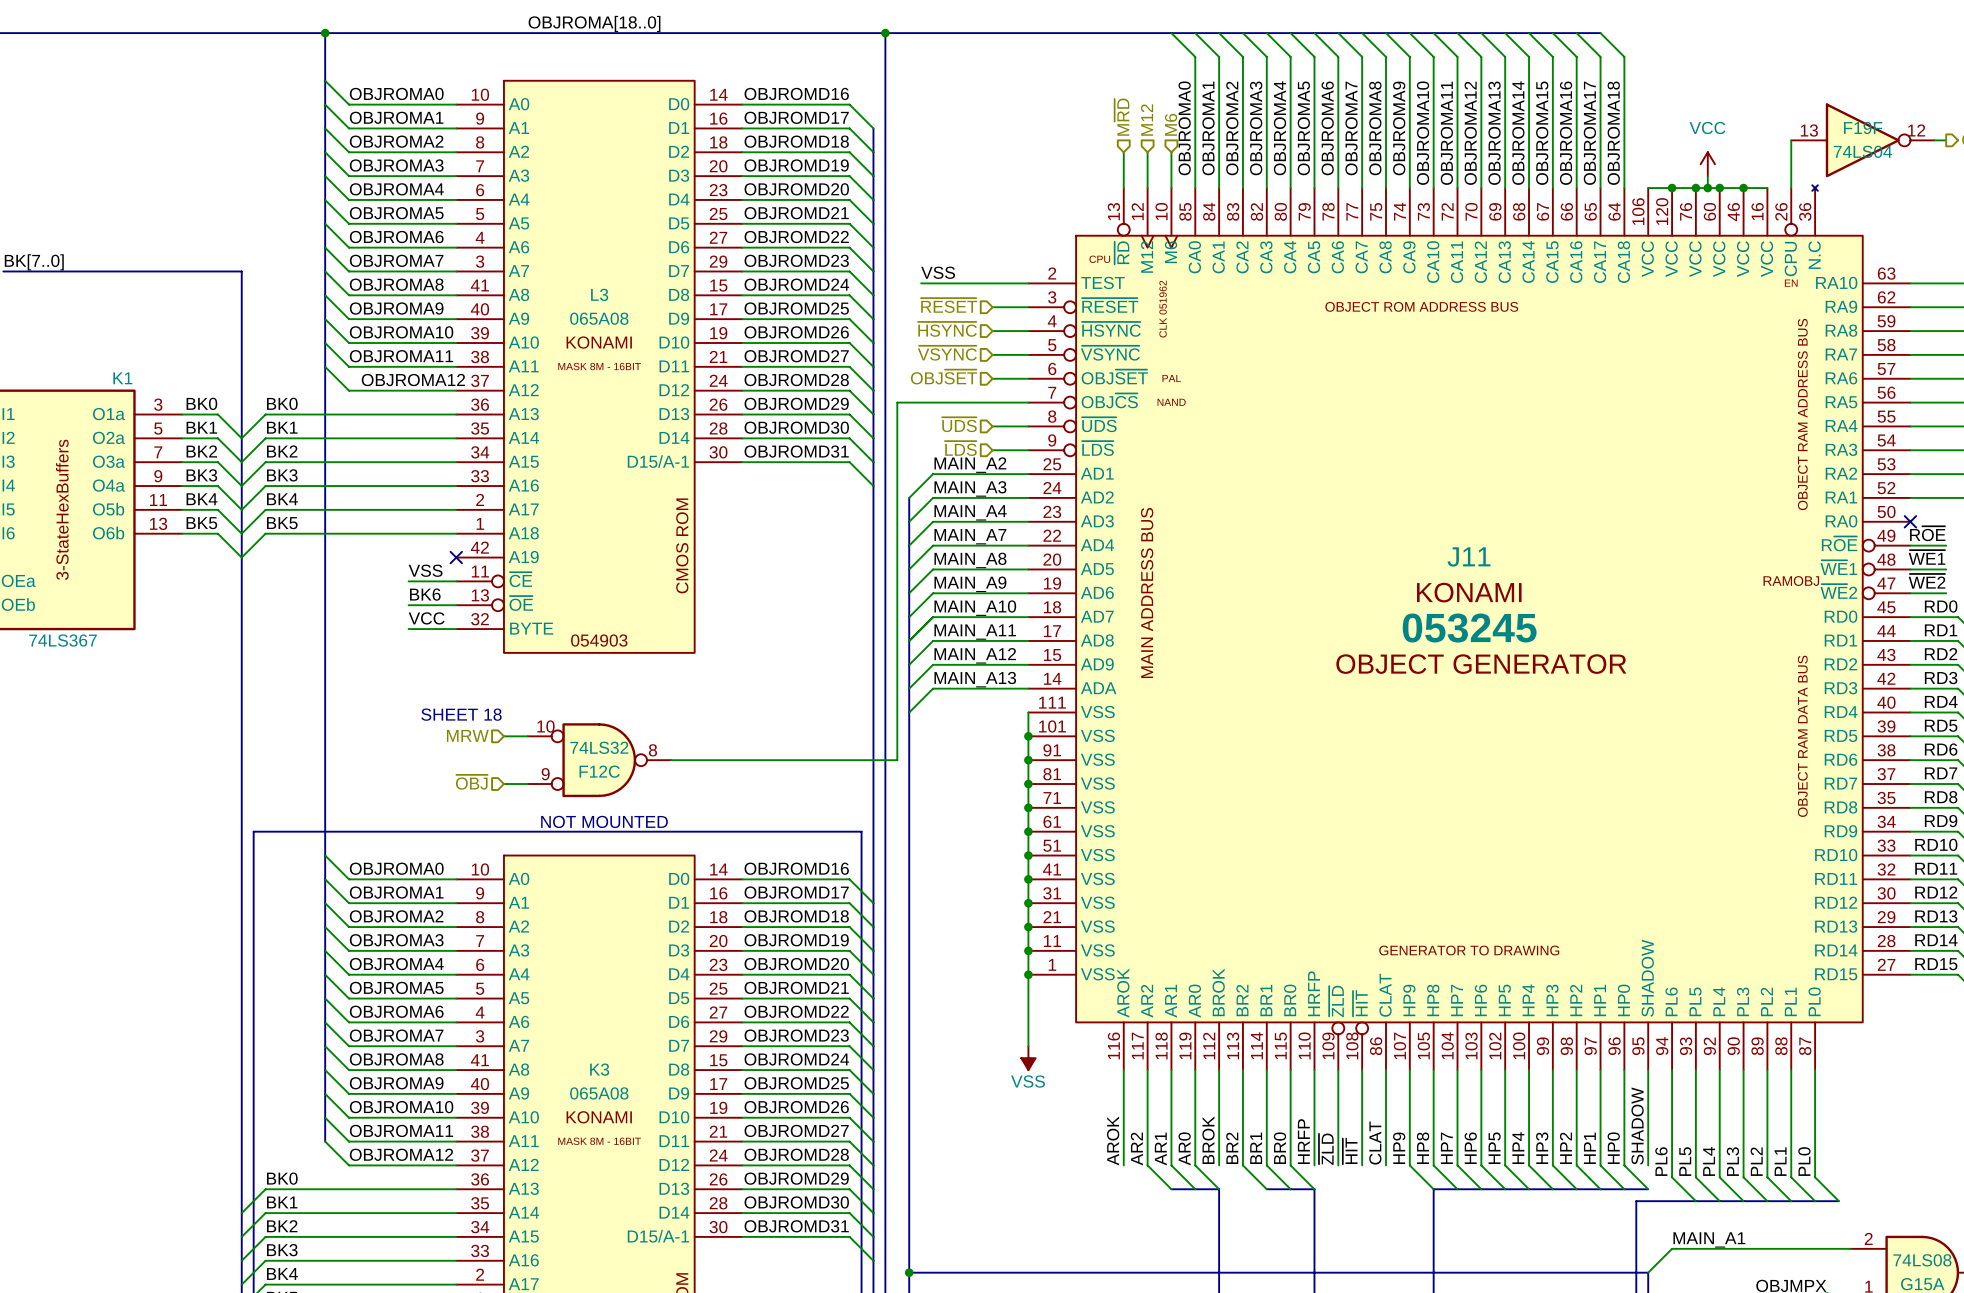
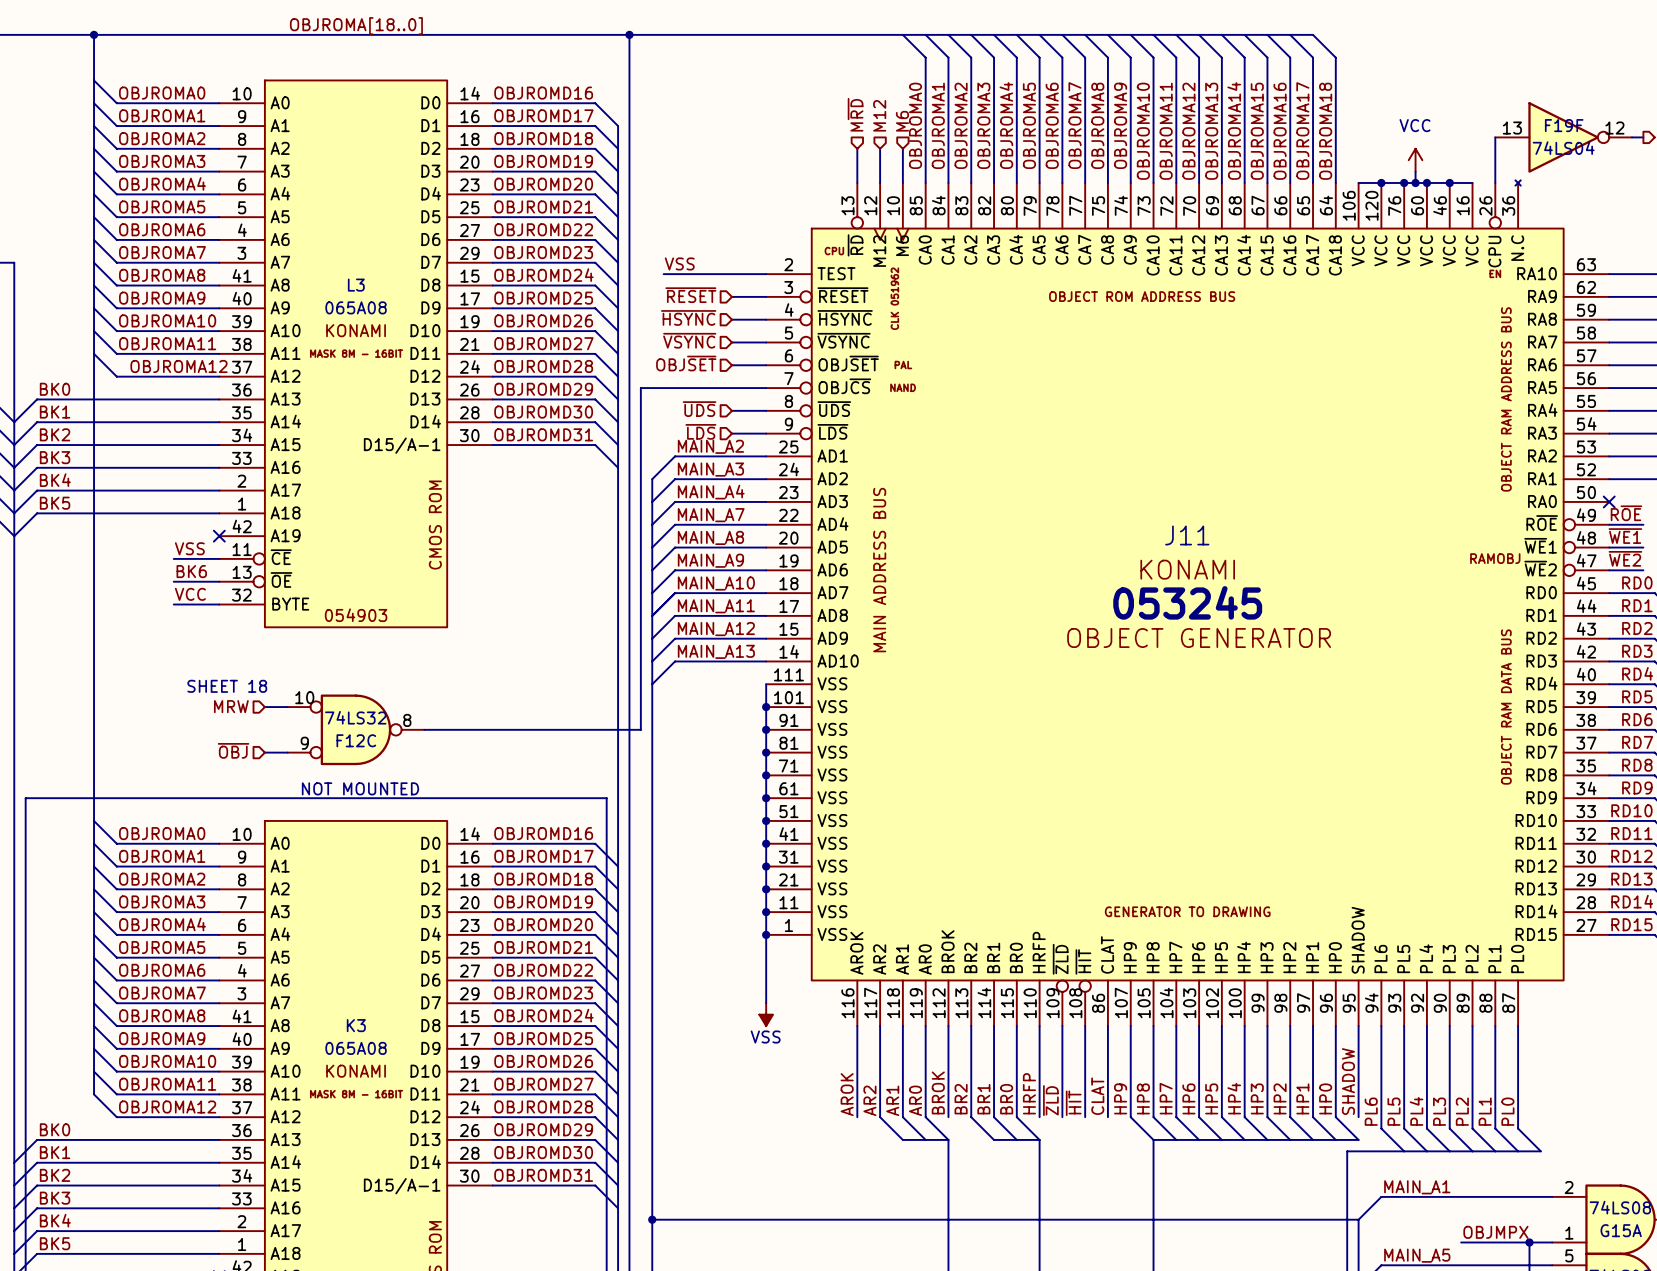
J11 pin name: ADA (1098, 688) -> AD10 (838, 661)

